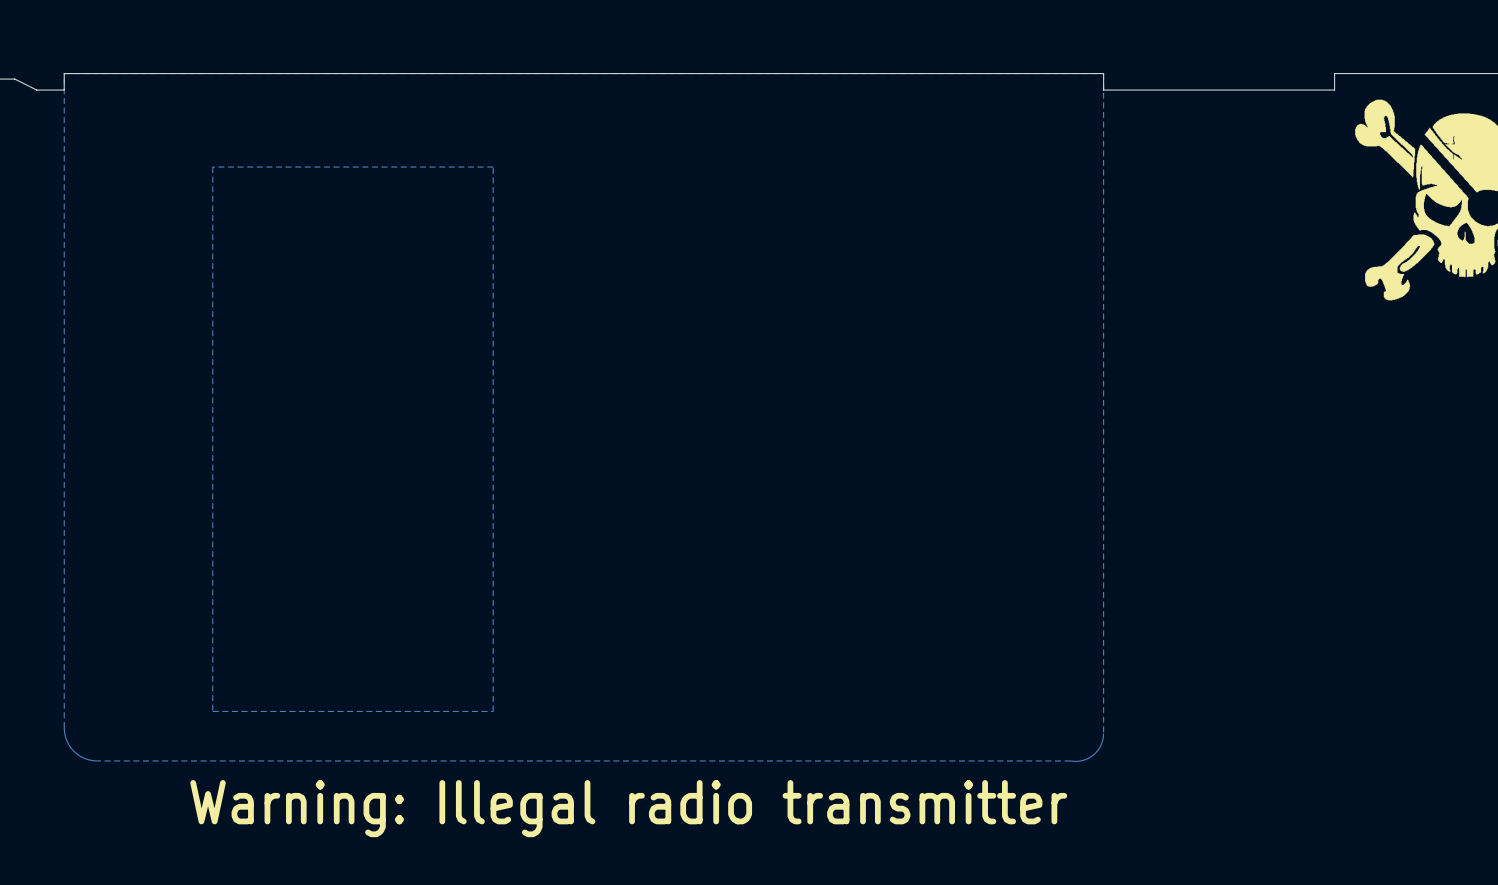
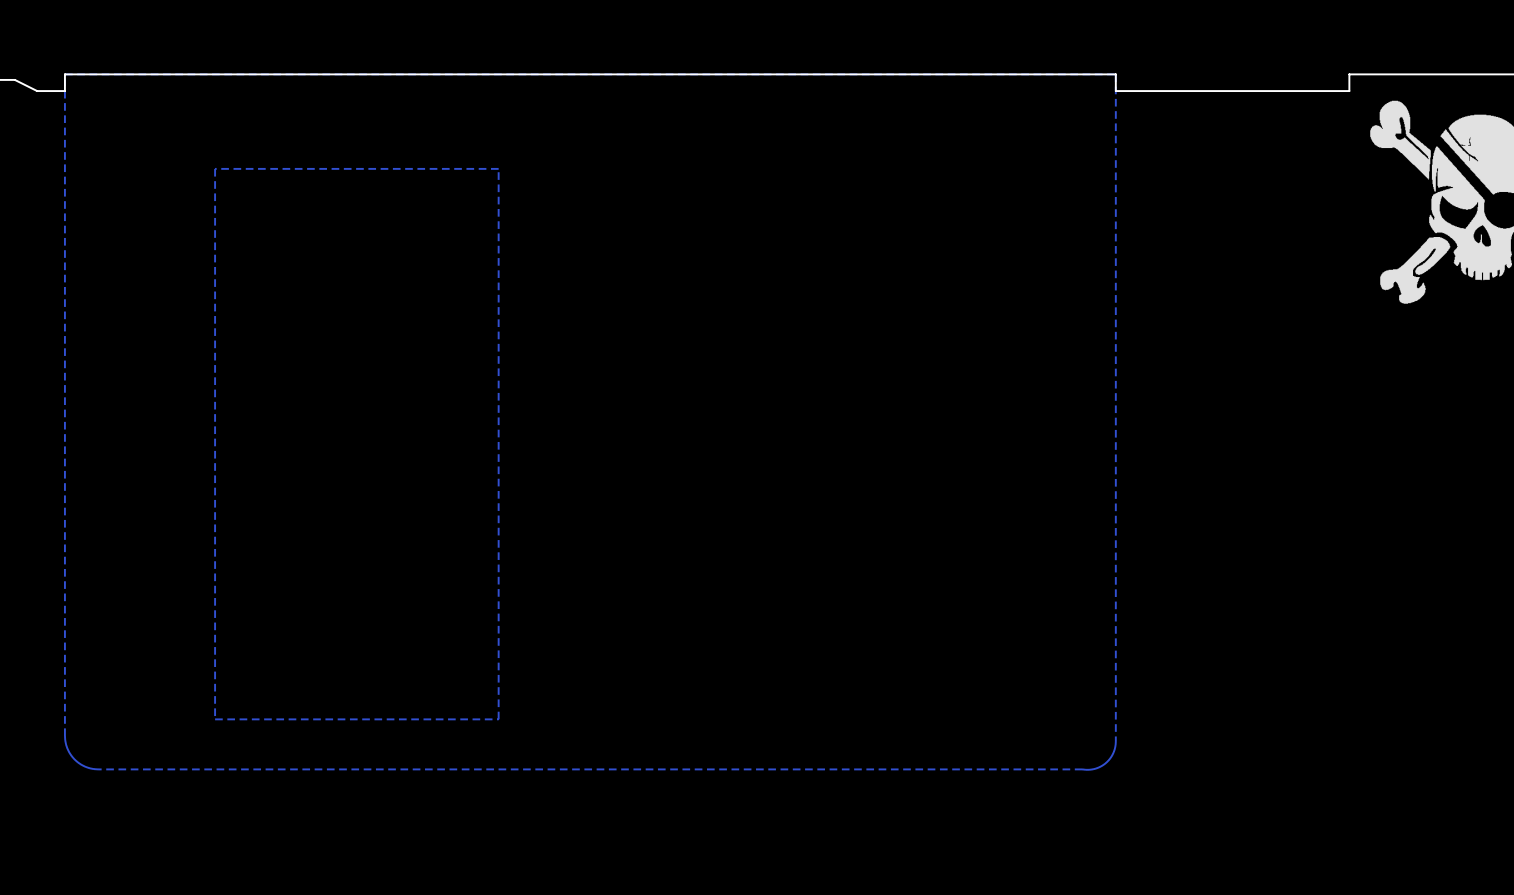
text: Warning: Illegal radio transmitter (628, 808) -> none

